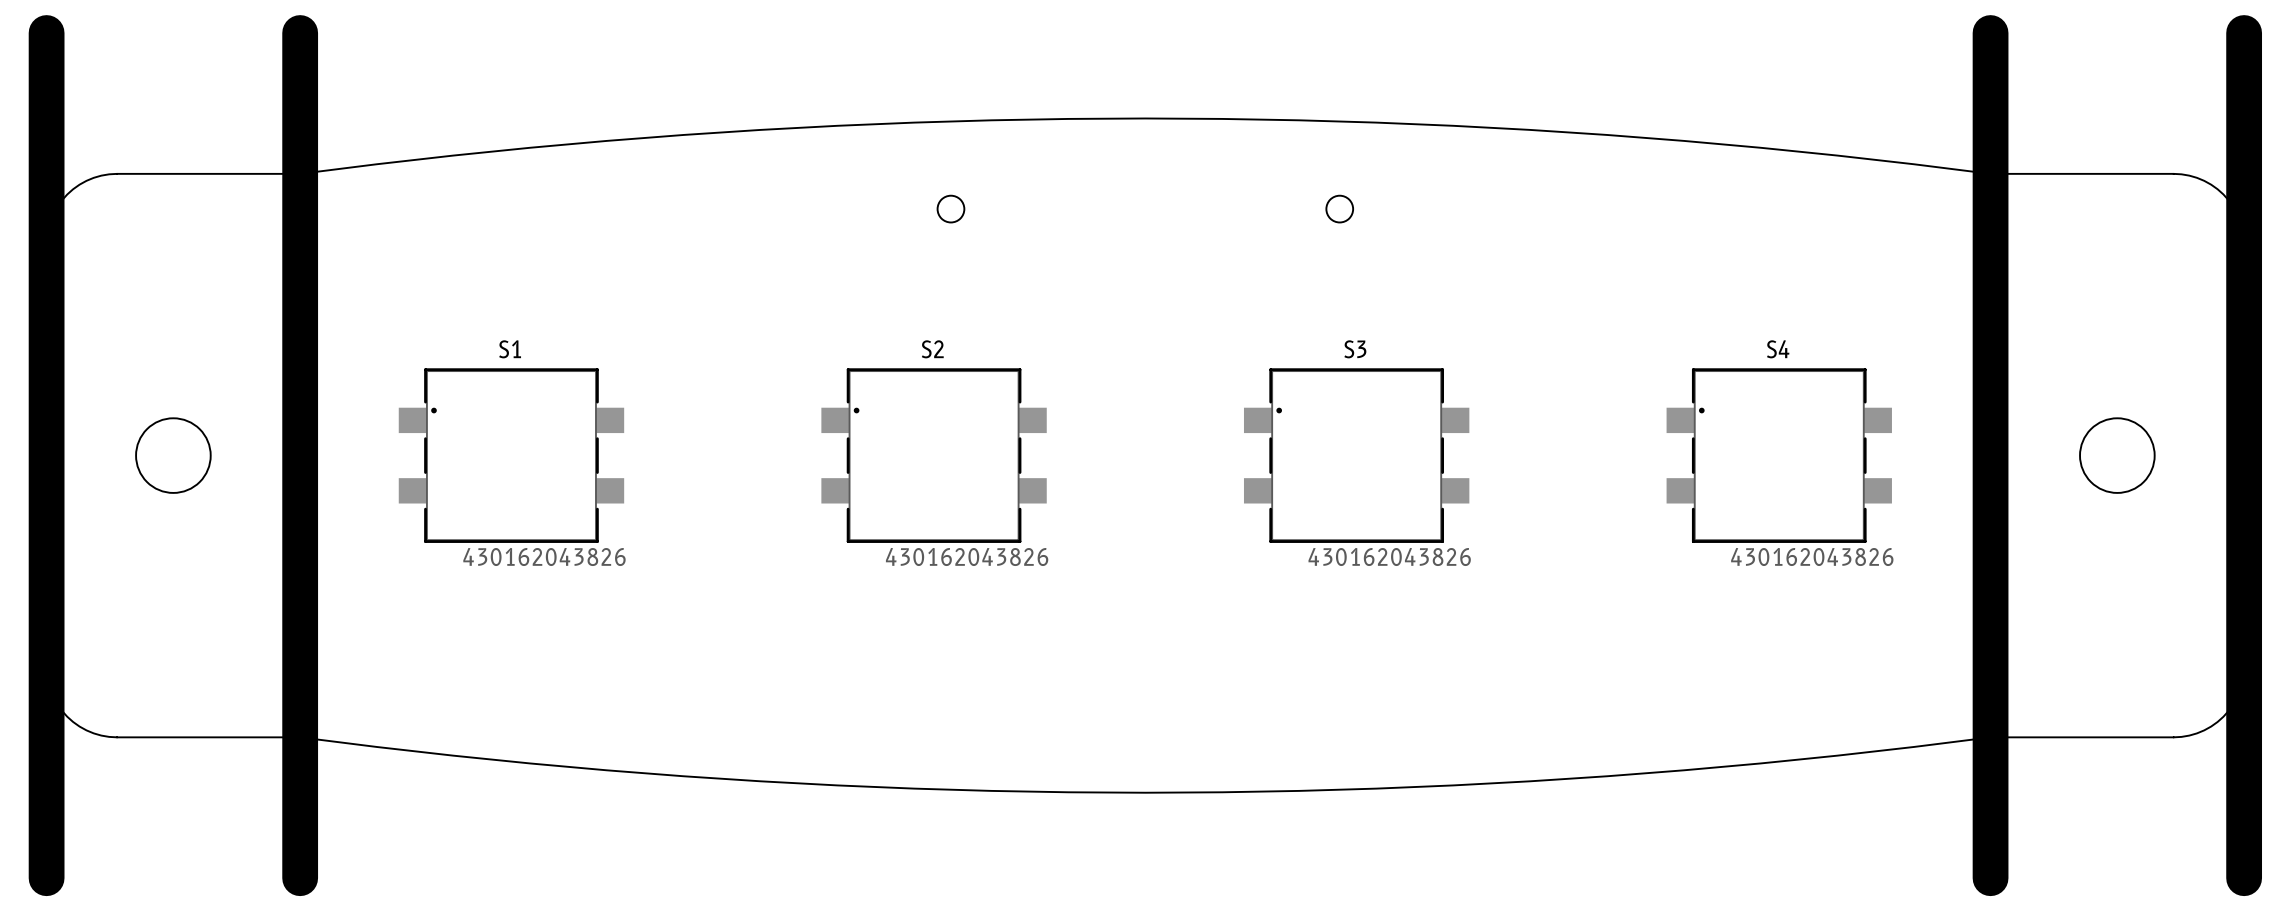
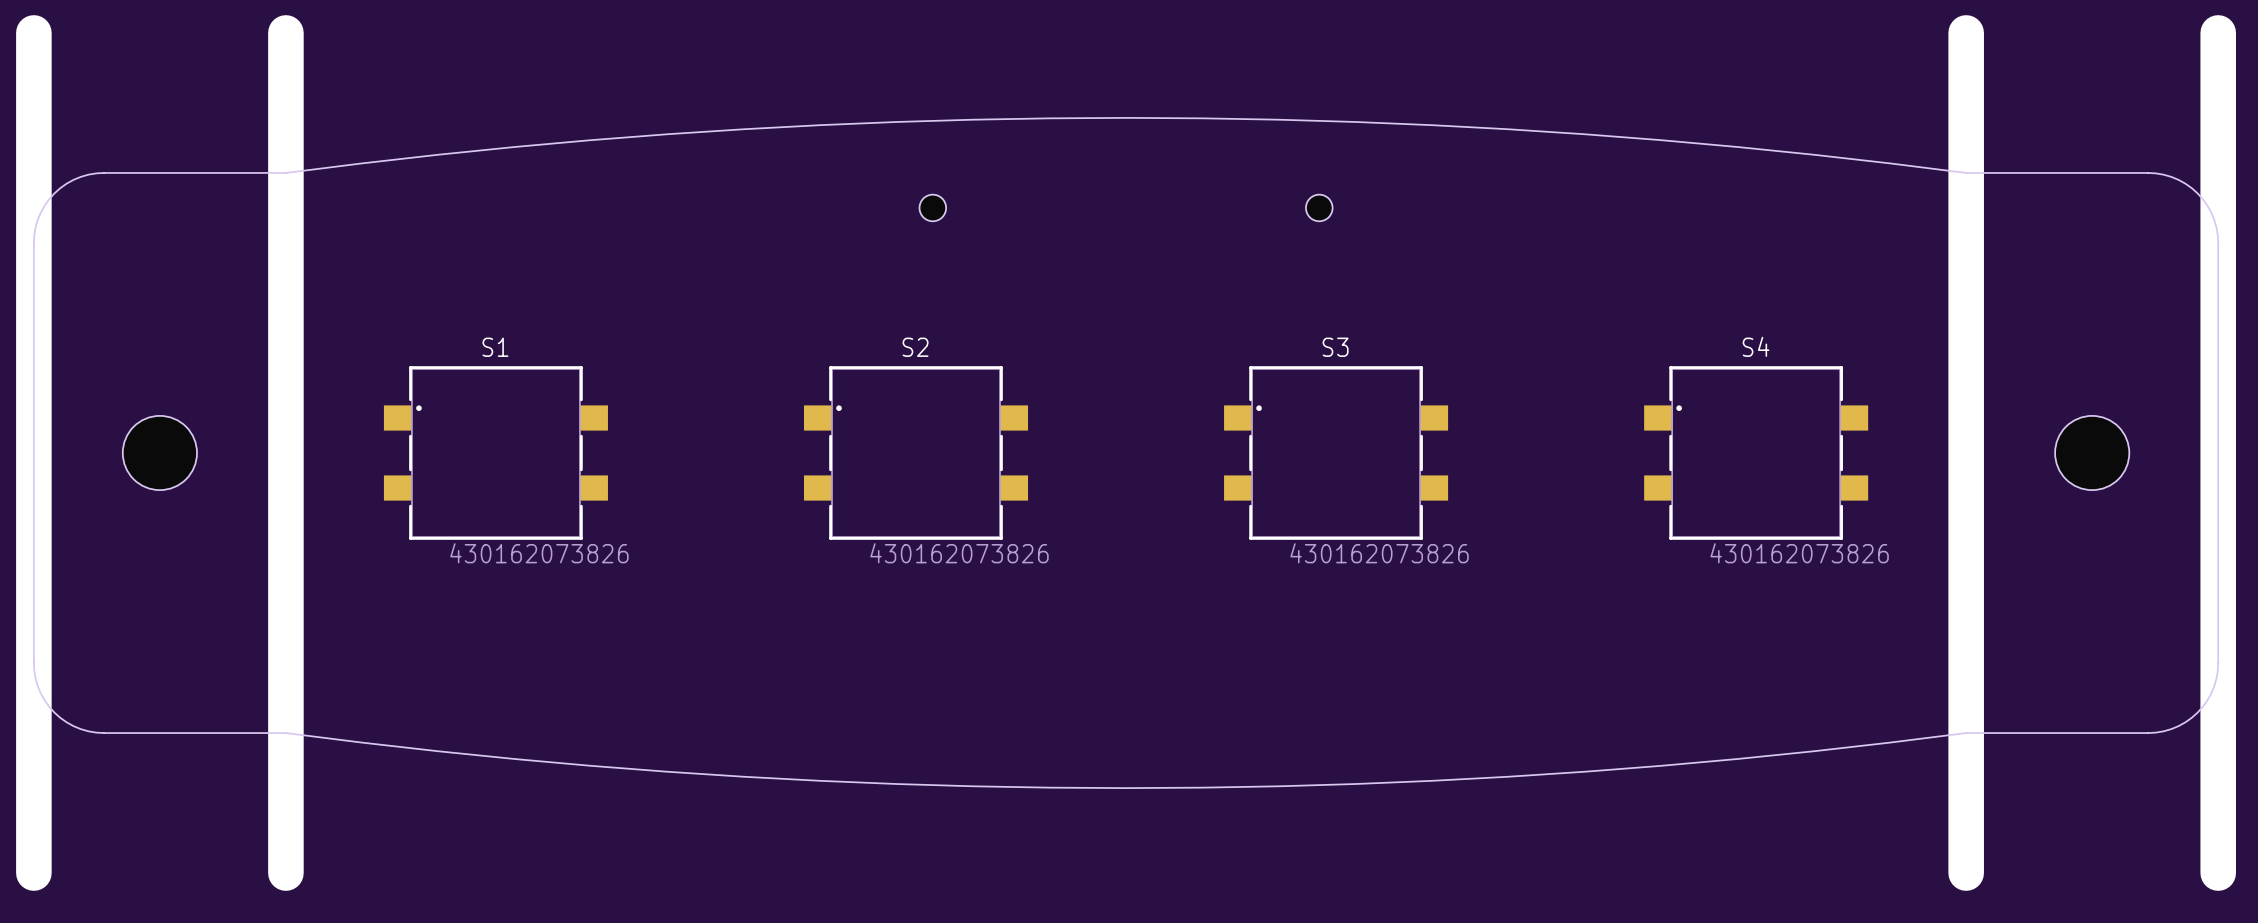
S1 value: 430162043826 (544, 557) -> 430162073826 (539, 553)
S2 value: 430162043826 (967, 557) -> 430162073826 (959, 553)
S3 value: 430162043826 (1389, 557) -> 430162073826 (1379, 553)
S4 value: 430162043826 (1812, 557) -> 430162073826 (1799, 553)

